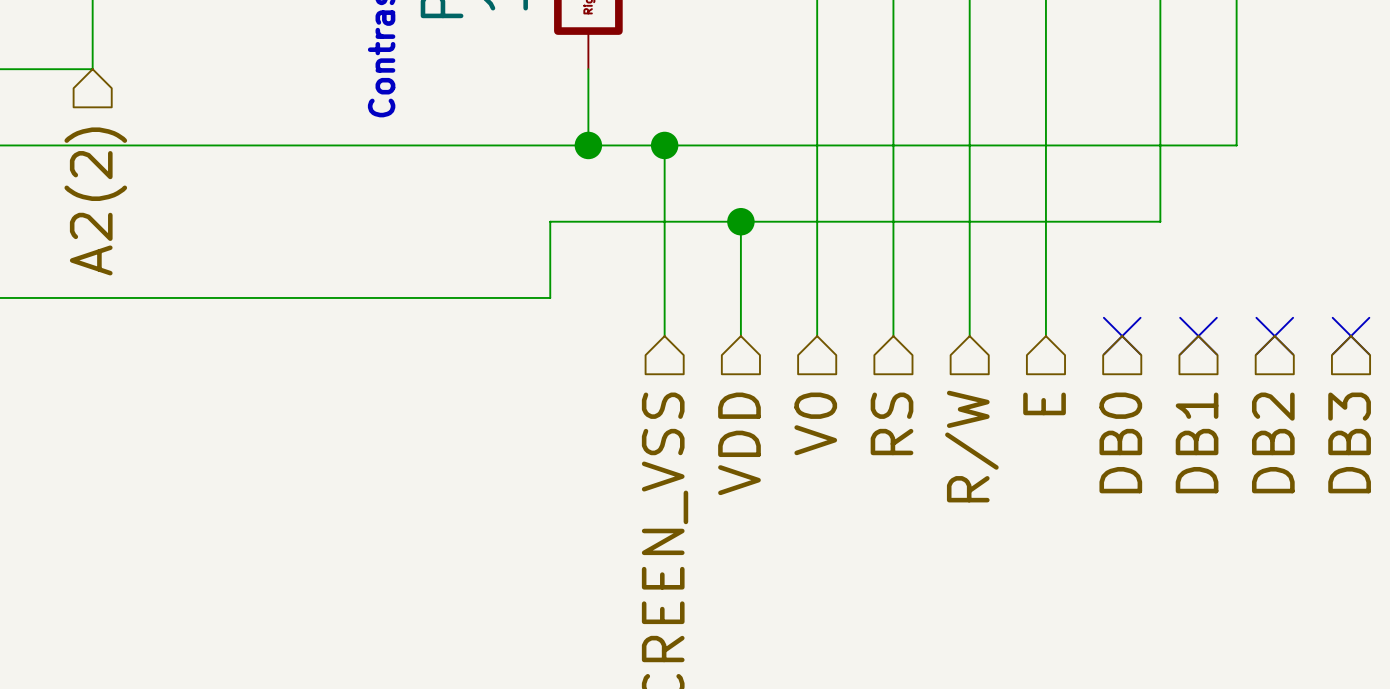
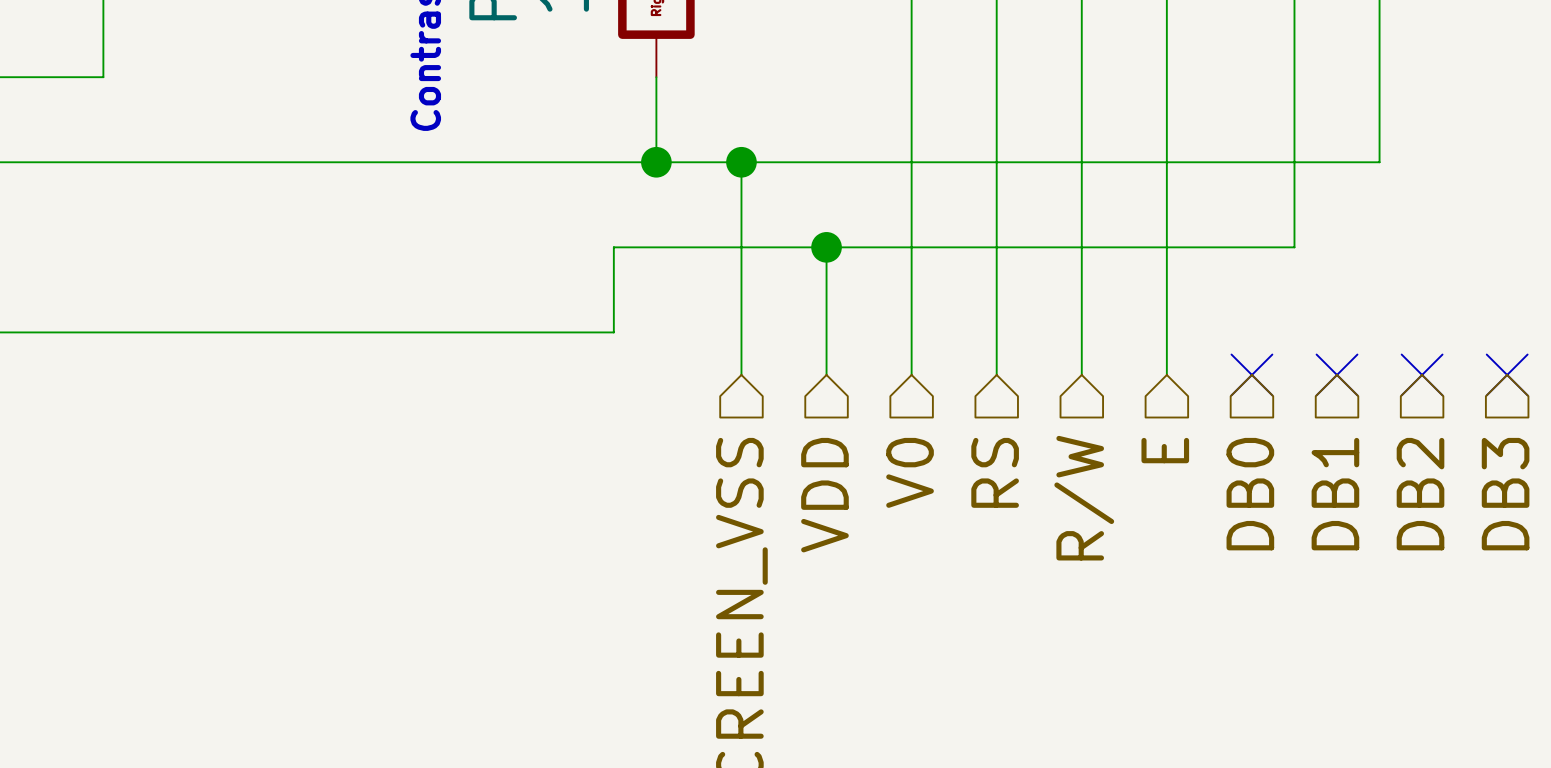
hierarchical label: A2(2) (95, 201) -> none

